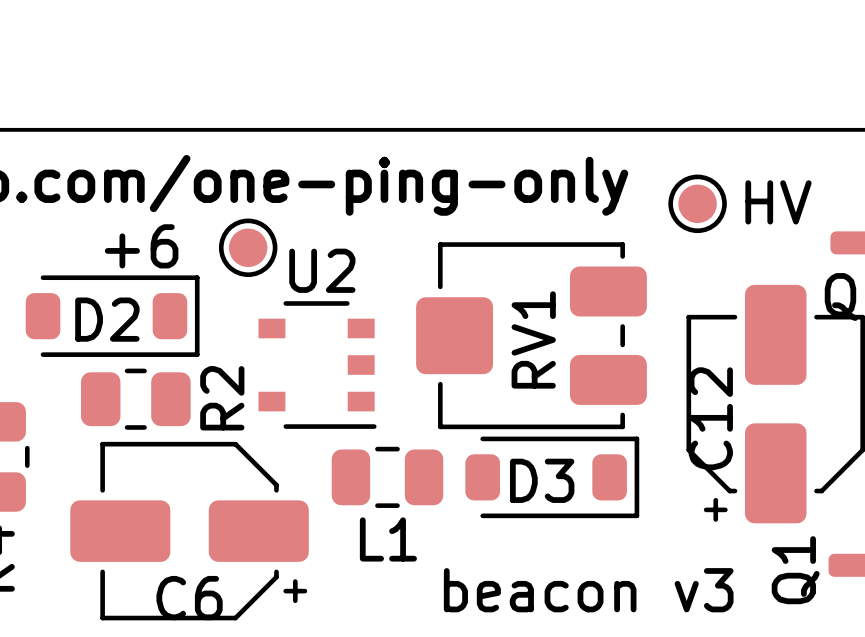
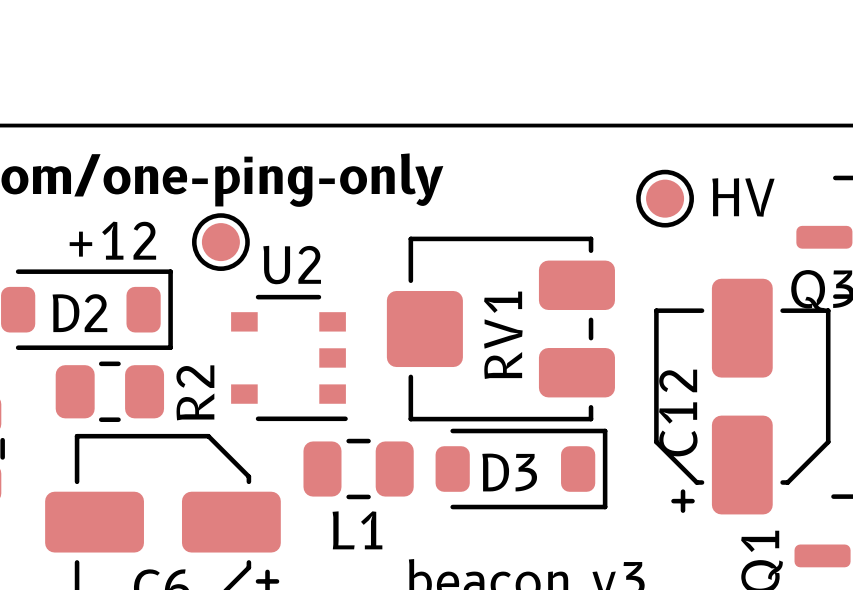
part value: +6 (141, 246) -> +12 (112, 240)

